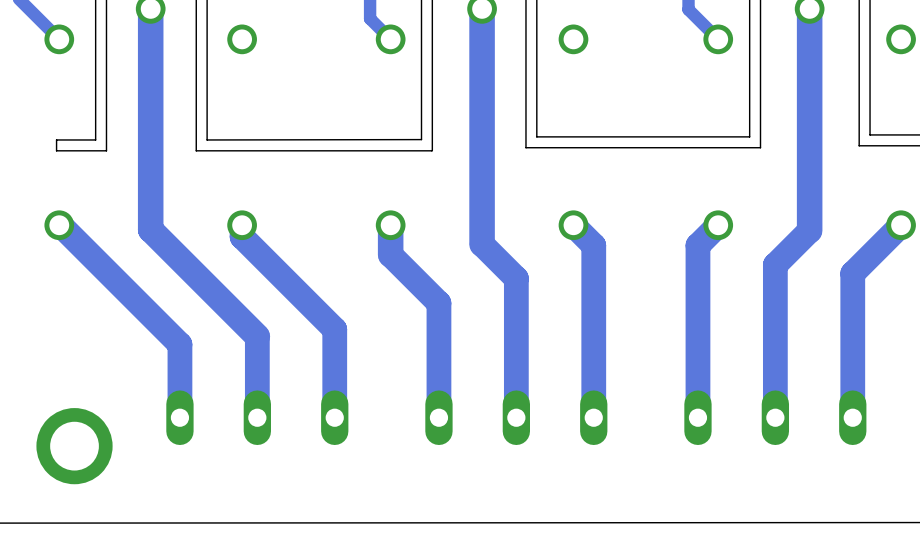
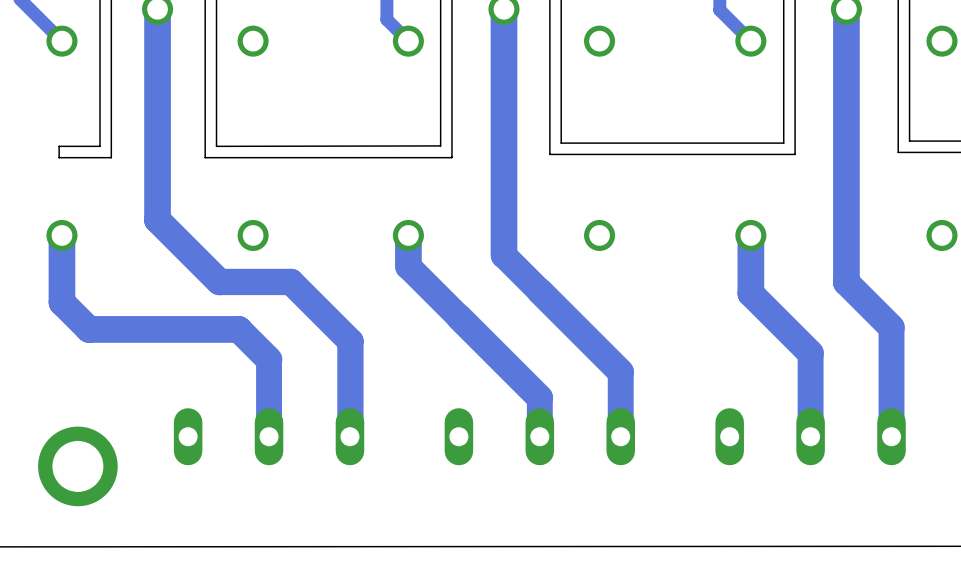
track: (150, 210) (150, 229) (257, 336) (257, 344) -> (61, 235) (61, 302) (89, 329) (238, 329) (269, 359)
track: (59, 225) (179, 344) (179, 417) -> none
track: (242, 225) (242, 236) (334, 329) (334, 417) -> (157, 220) (219, 281) (291, 281) (350, 341) (349, 436)
track: (573, 225) (593, 245) (593, 355) -> (539, 291) (620, 372)
track: (718, 225) (697, 245) (697, 417) -> (750, 235) (750, 293) (810, 353)
track: (901, 225) (852, 273) (852, 313) -> none
track: (809, 230) (775, 264) (775, 337) -> (846, 241) (846, 282) (891, 327)
track: (516, 278) (516, 380) -> (458, 317) (539, 397)
track: (438, 303) (438, 417) -> none

